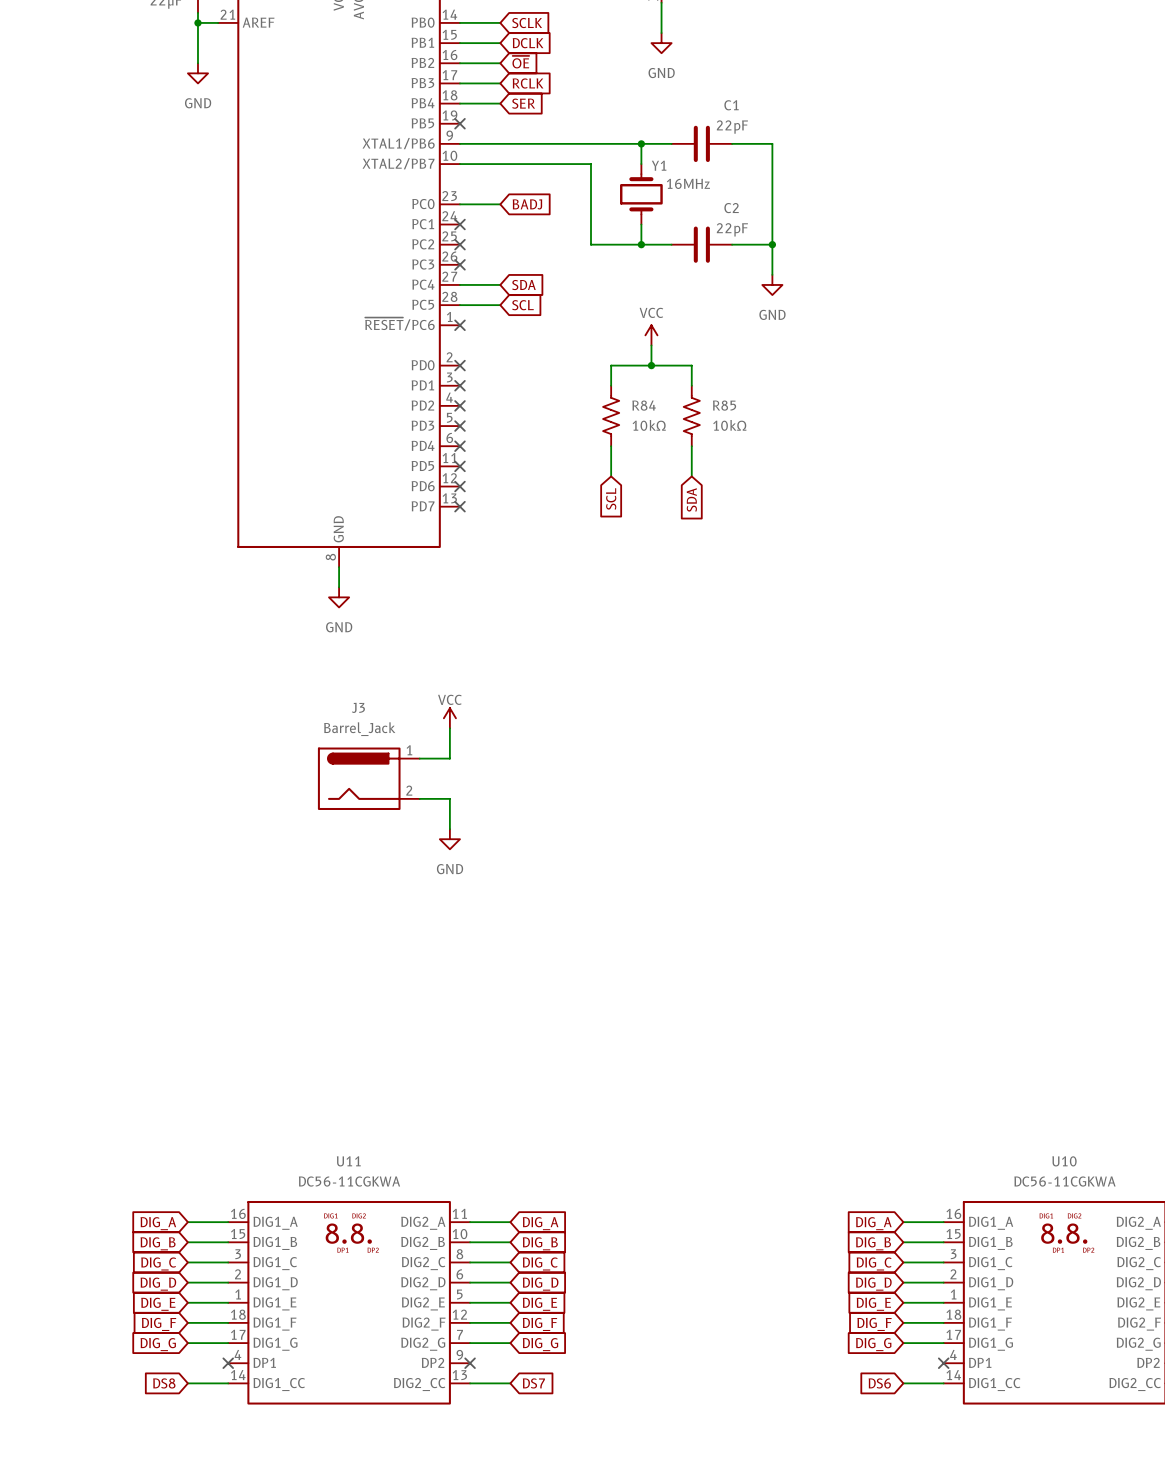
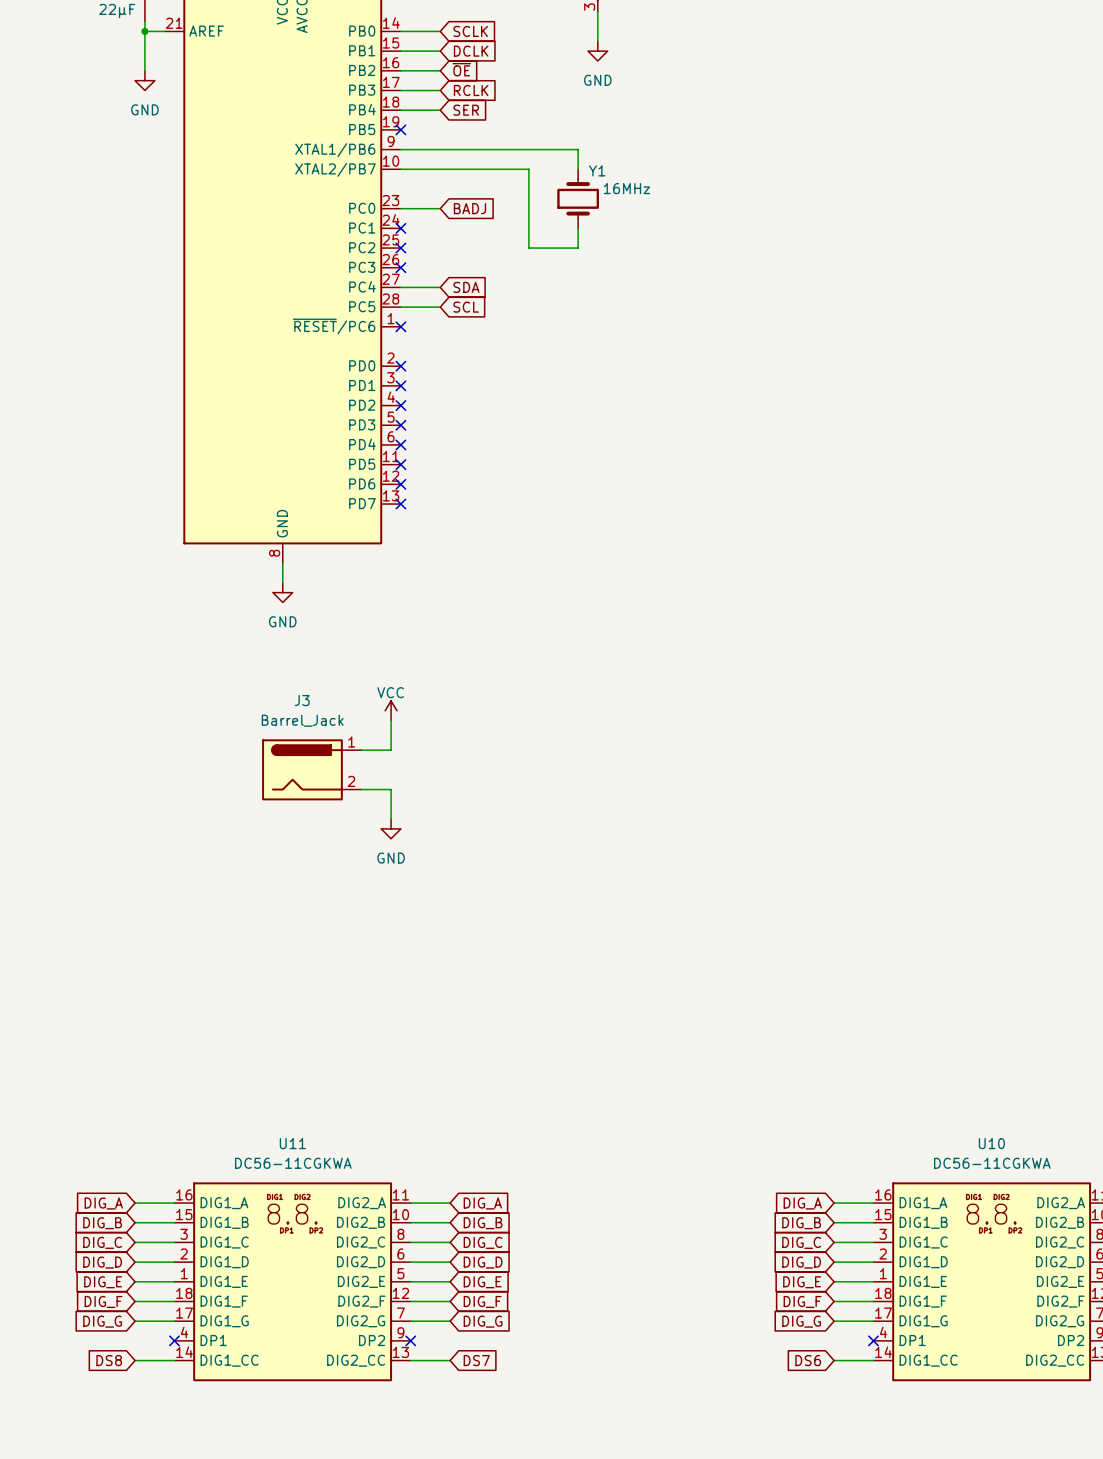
wire: (641, 143) (671, 143) -> none
junction: (641, 143) -> none
C1: 22pF (701, 143) -> none
wire: (732, 143) (772, 143) (772, 274) -> none
wire: (641, 244) (671, 244) -> none
junction: (641, 244) -> none
C2: 22pF (701, 244) -> none
wire: (732, 244) (772, 244) -> none
junction: (772, 244) -> none
power symbol: GND (772, 284) -> none
power symbol: VCC (651, 335) -> none
wire: (651, 345) (651, 365) -> none
junction: (651, 365) -> none
wire: (611, 385) (611, 365) (691, 365) (691, 385) -> none
R84: 10kΩ (611, 415) -> none
R85: 10kΩ (691, 415) -> none
wire: (611, 446) (611, 476) -> none
wire: (691, 446) (691, 476) -> none
global label: SCL (611, 498) -> none
global label: SDA (691, 499) -> none

